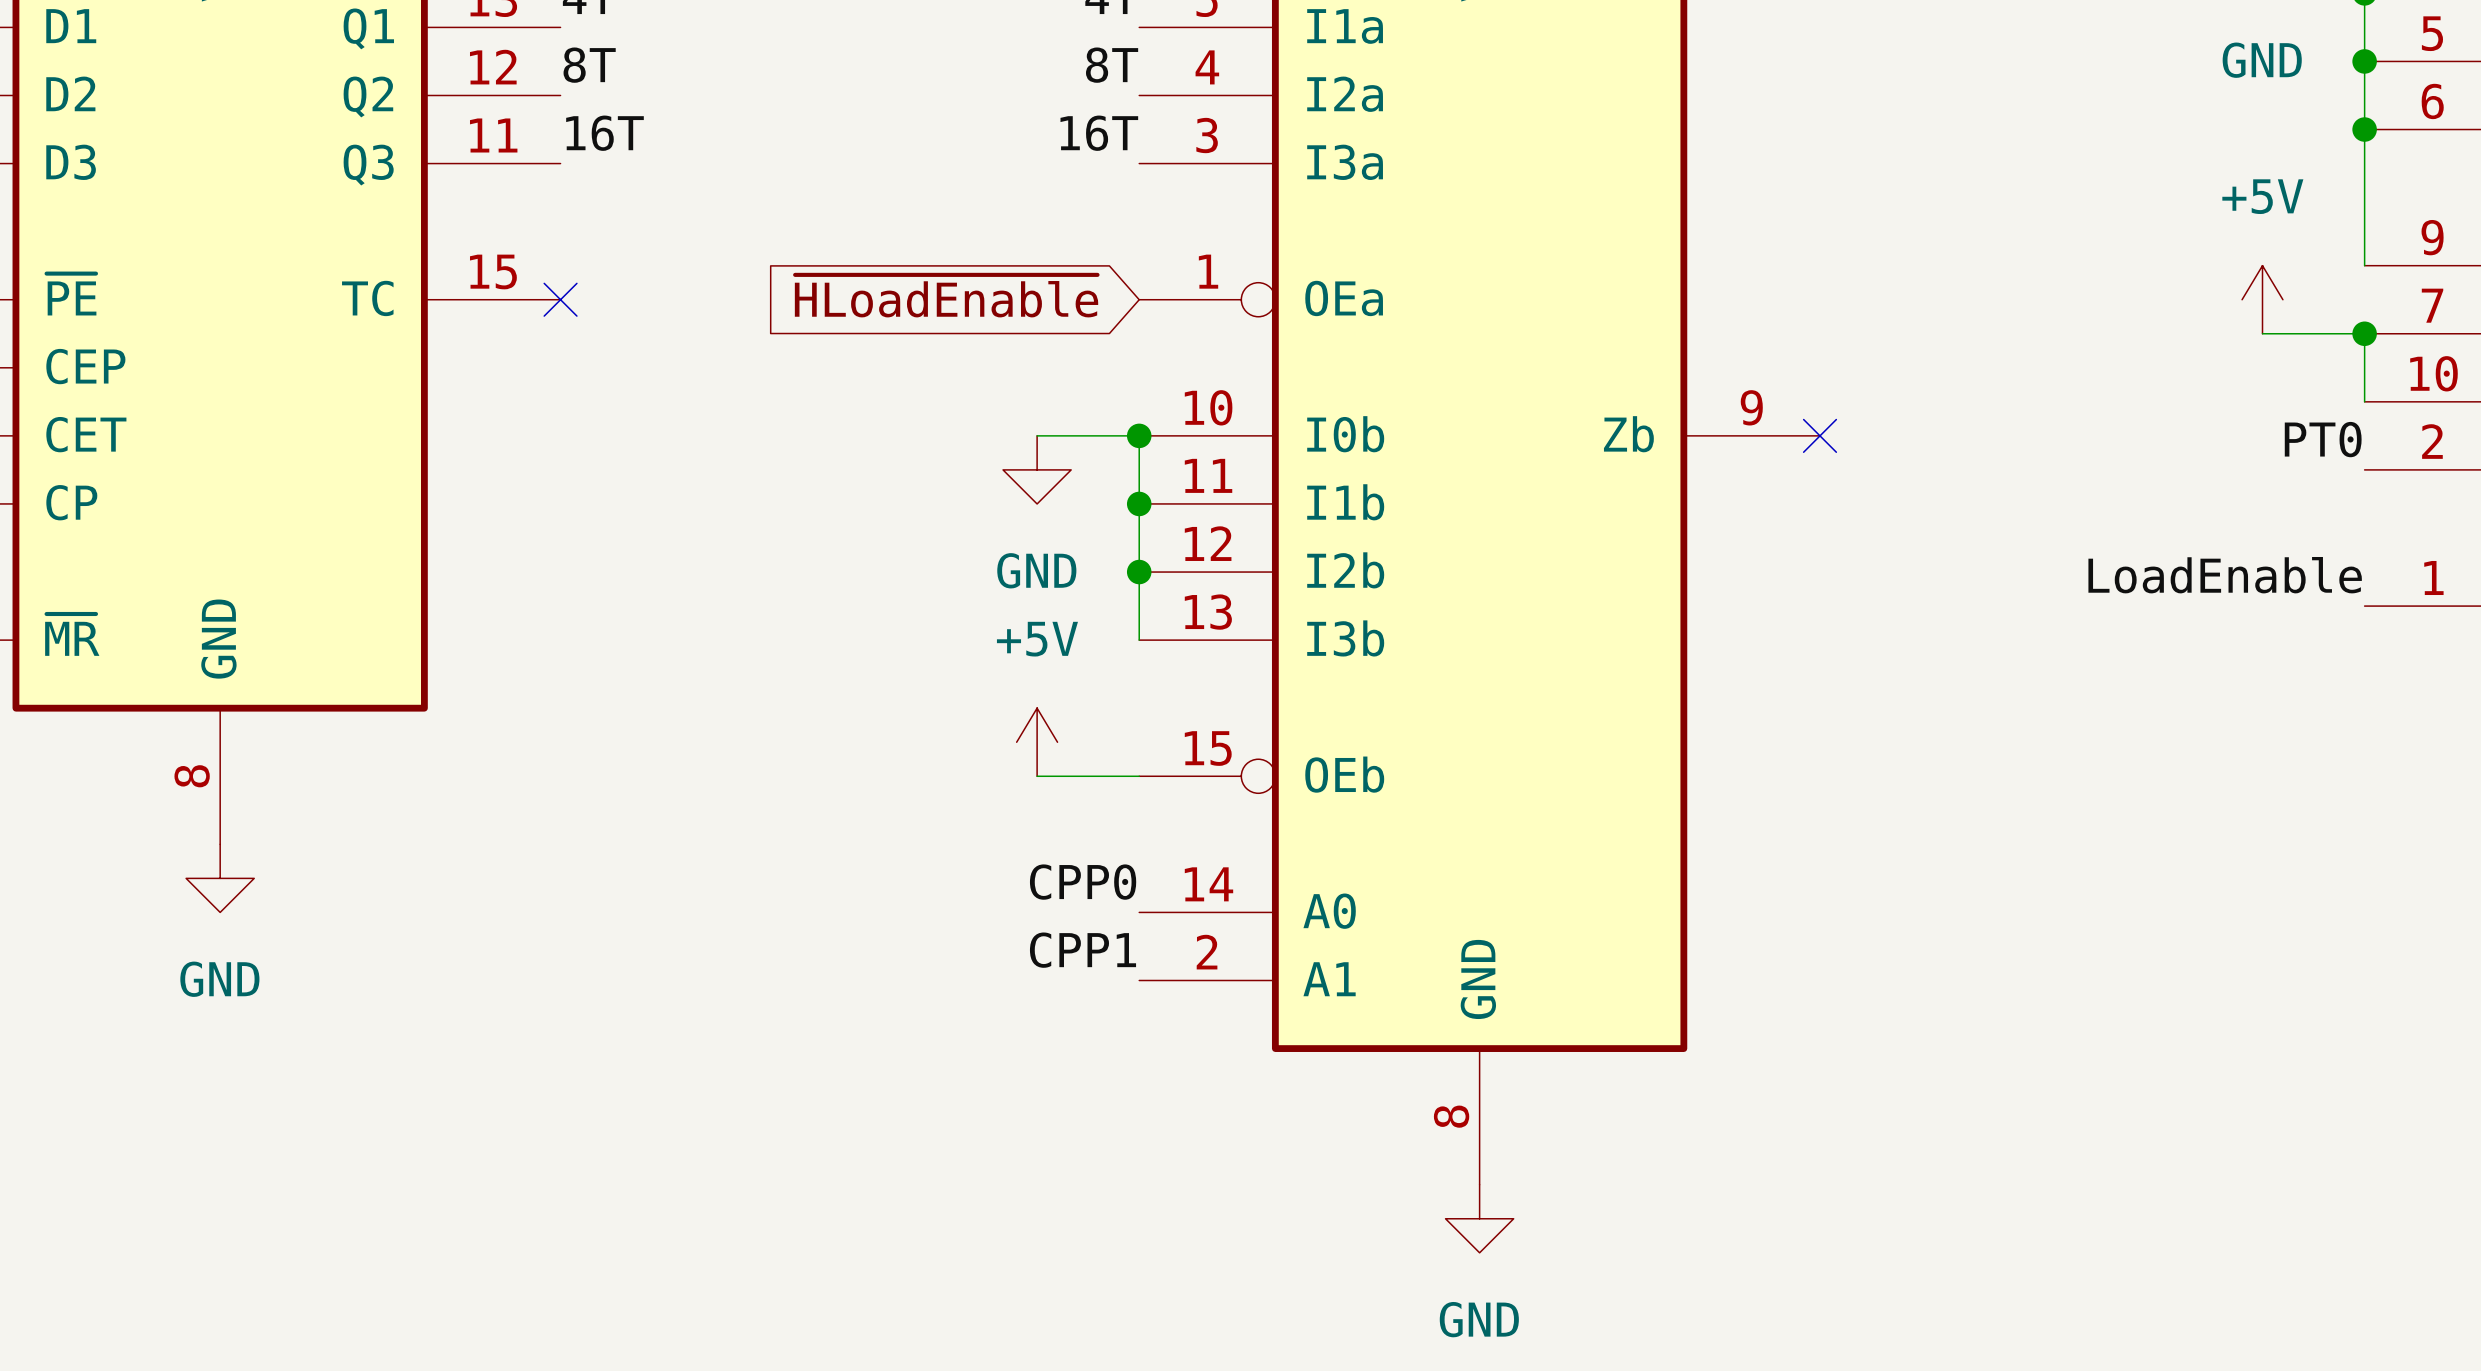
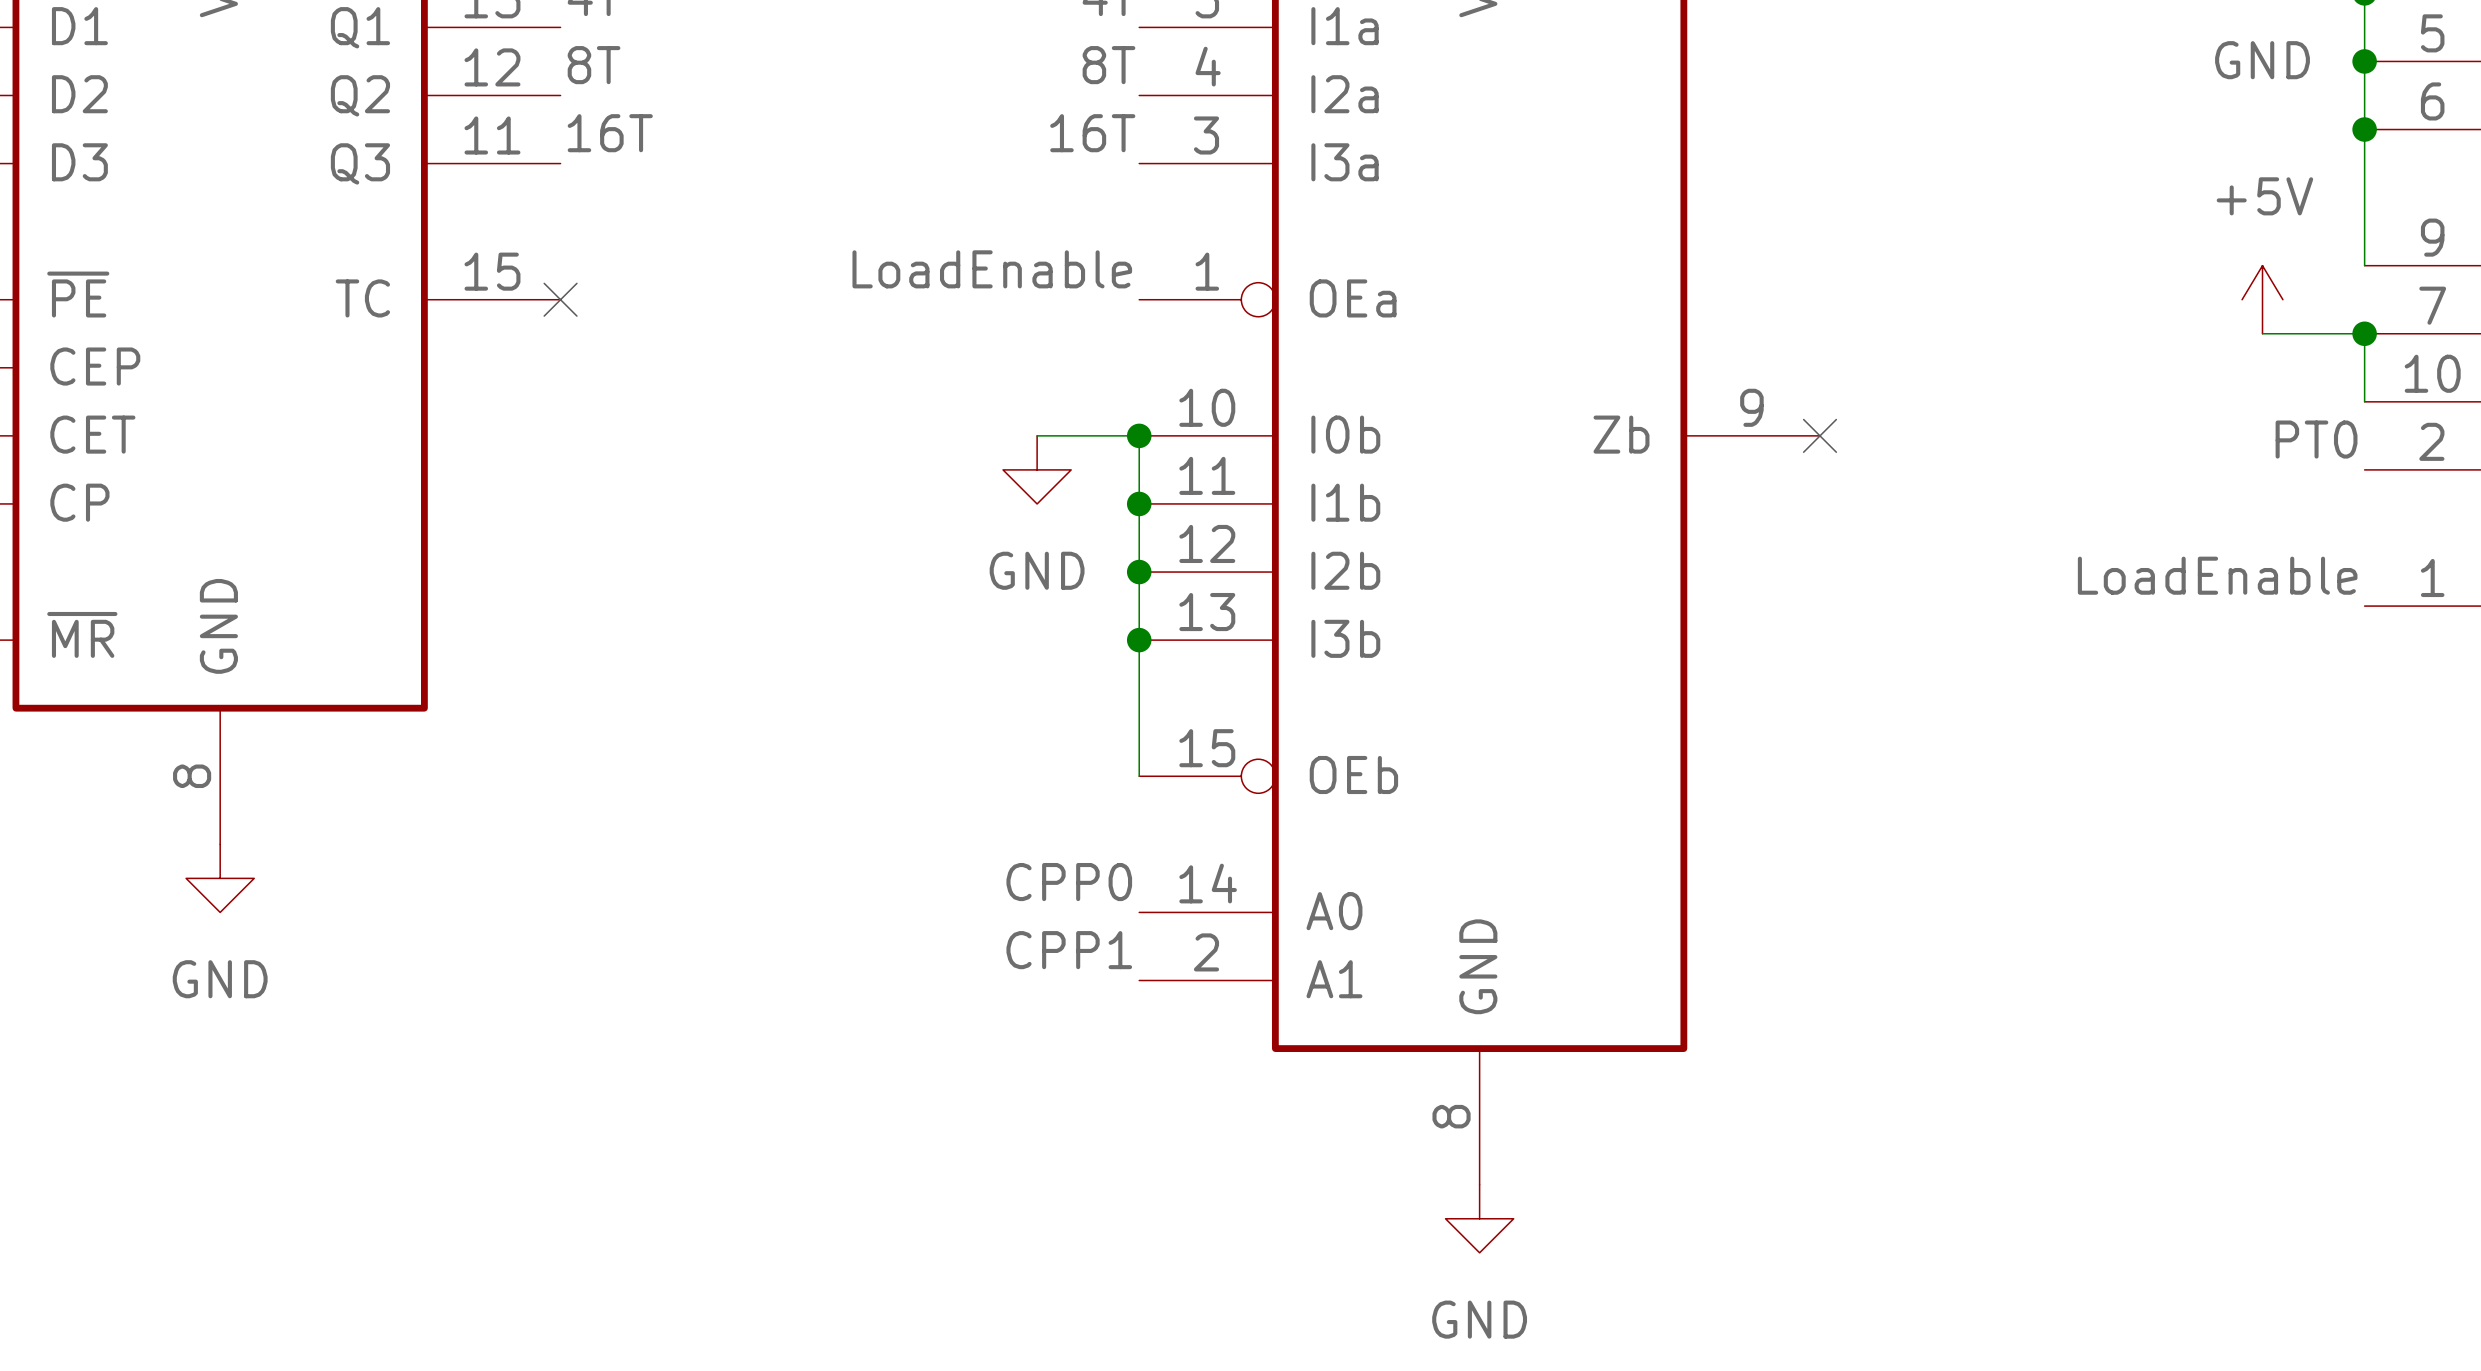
label: none -> LoadEnable (992, 269)
global label: ~{HLoadEnable} (946, 296) -> none
junction: none -> (1139, 640)
power symbol: +5V (1037, 742) -> none
wire: (1037, 776) (1139, 776) -> (1139, 640) (1139, 776)

